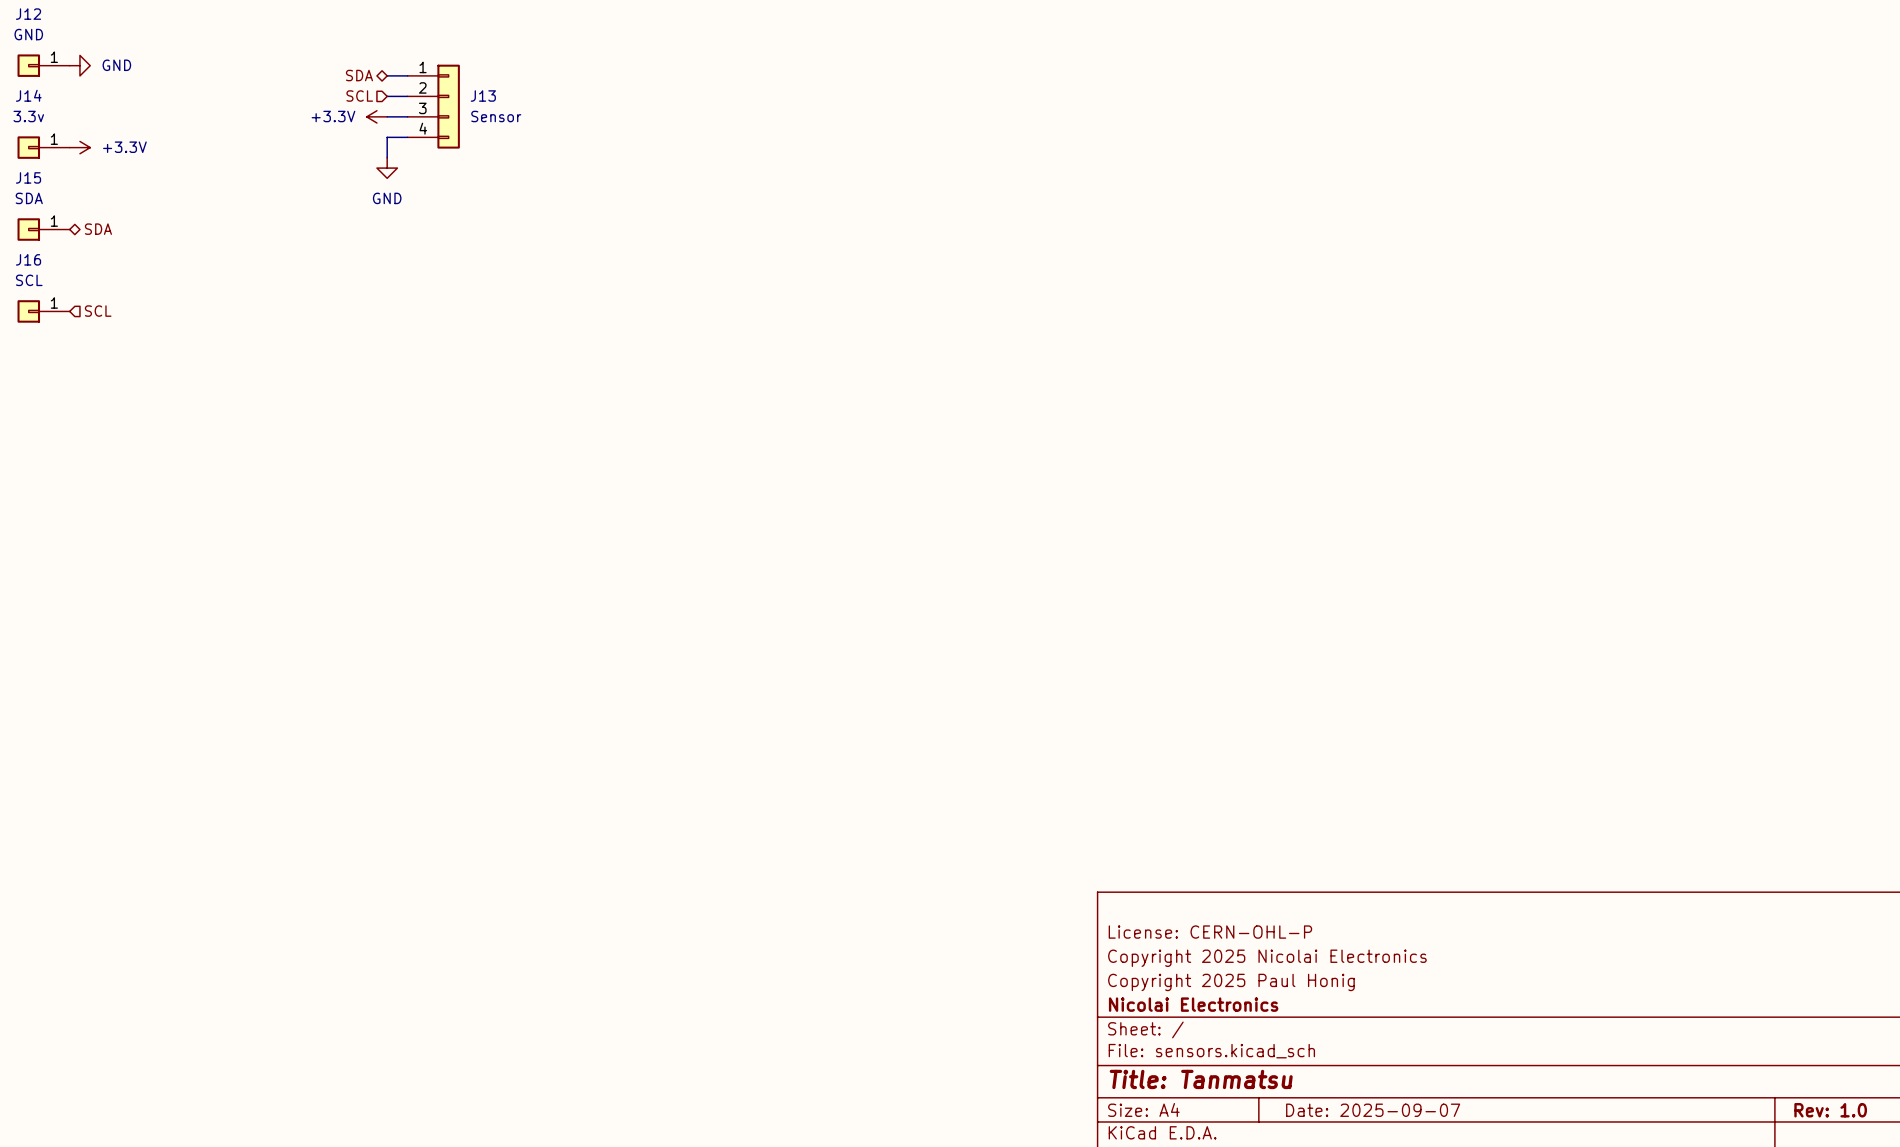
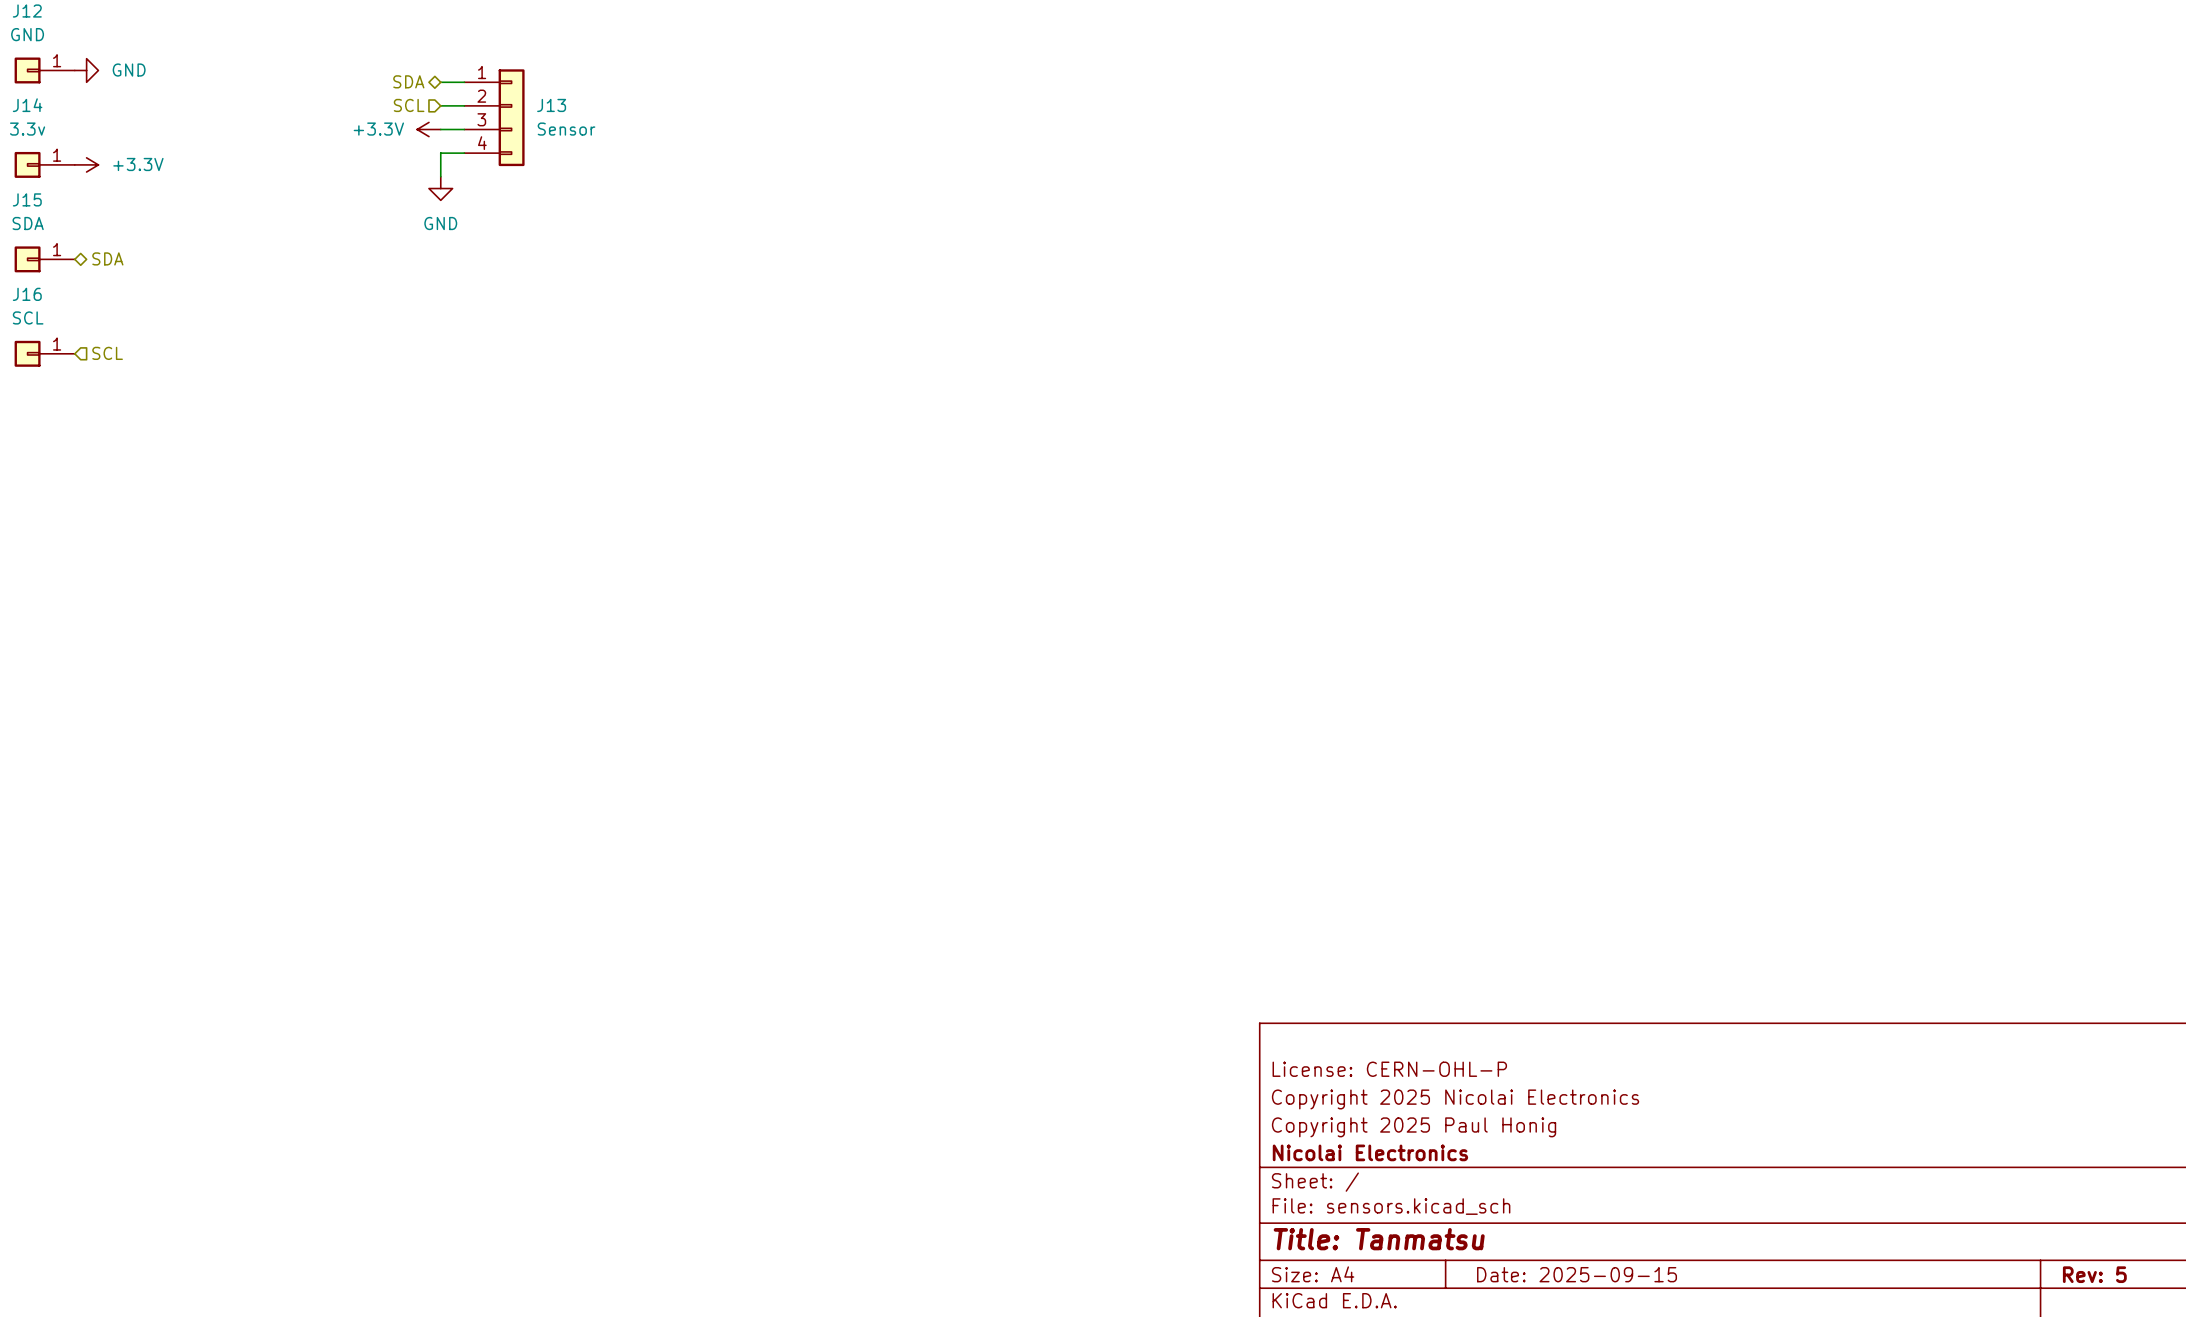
title block: Date: 2025-09-07 (1373, 1110) -> Date: 2025-09-15 (1577, 1274)
title block: Rev: 1.0 (1830, 1110) -> Rev: 5 (2094, 1274)

